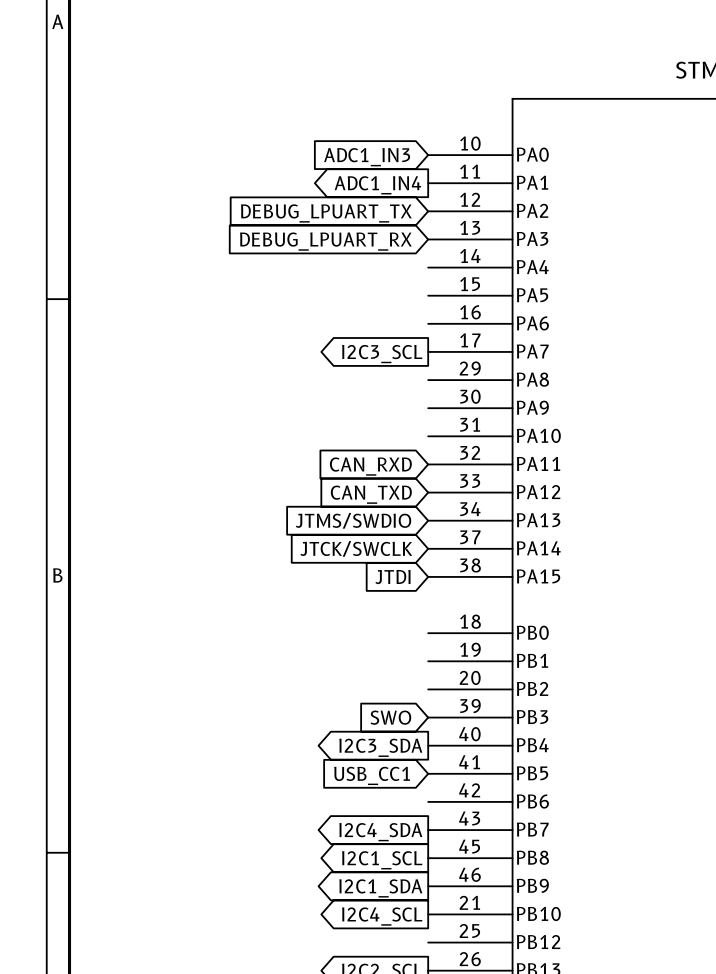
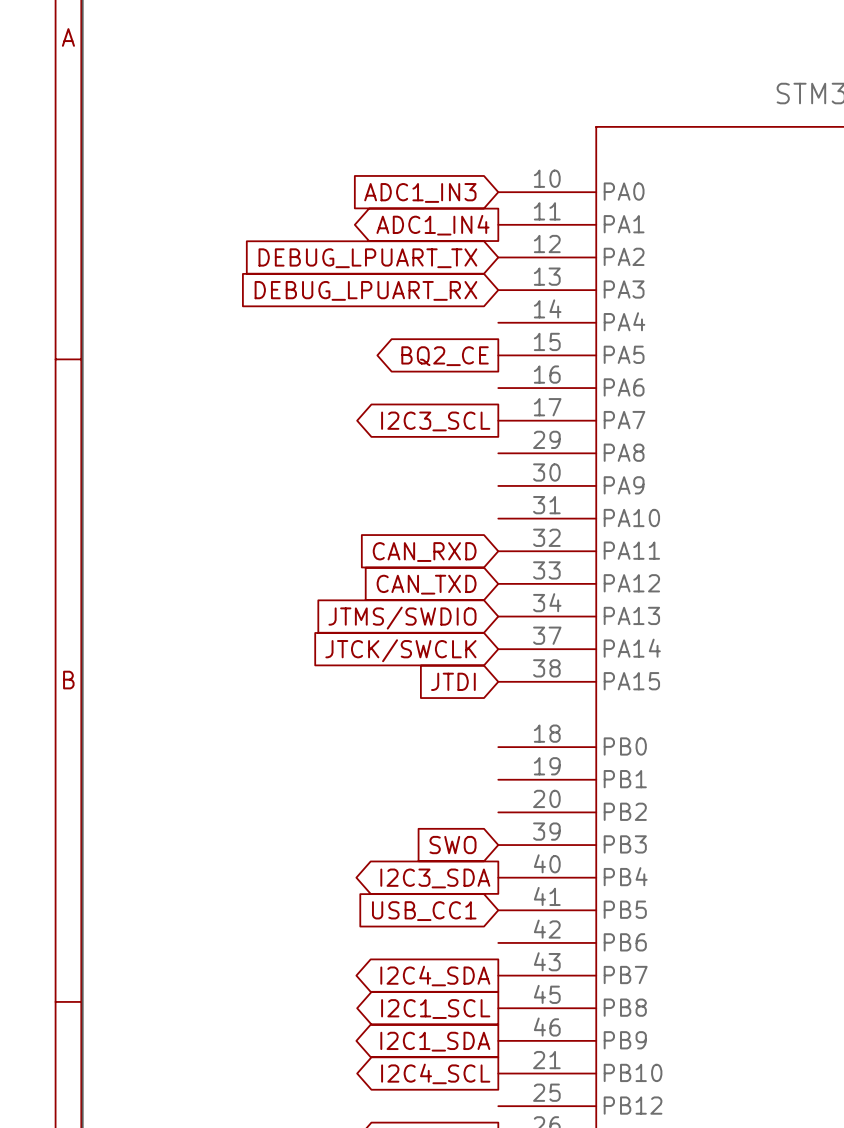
global label: none -> BQ2_CE (445, 356)

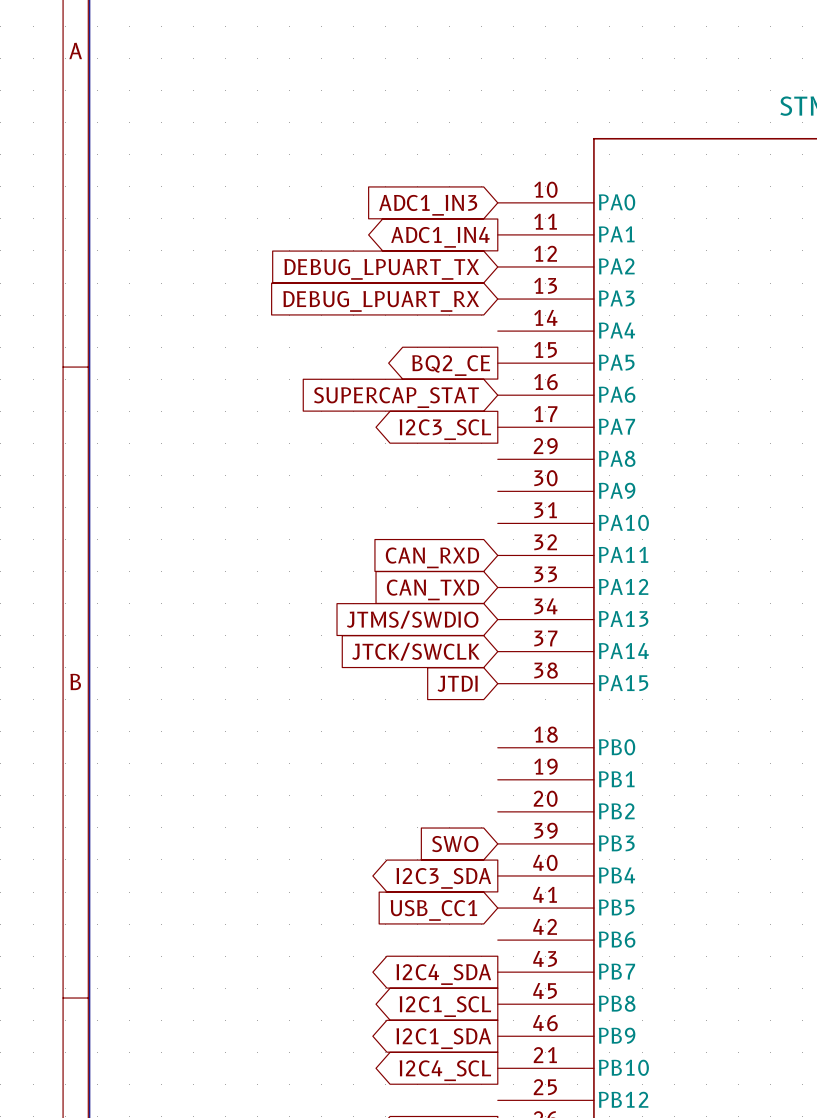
global label: none -> SUPERCAP_STAT (396, 397)

